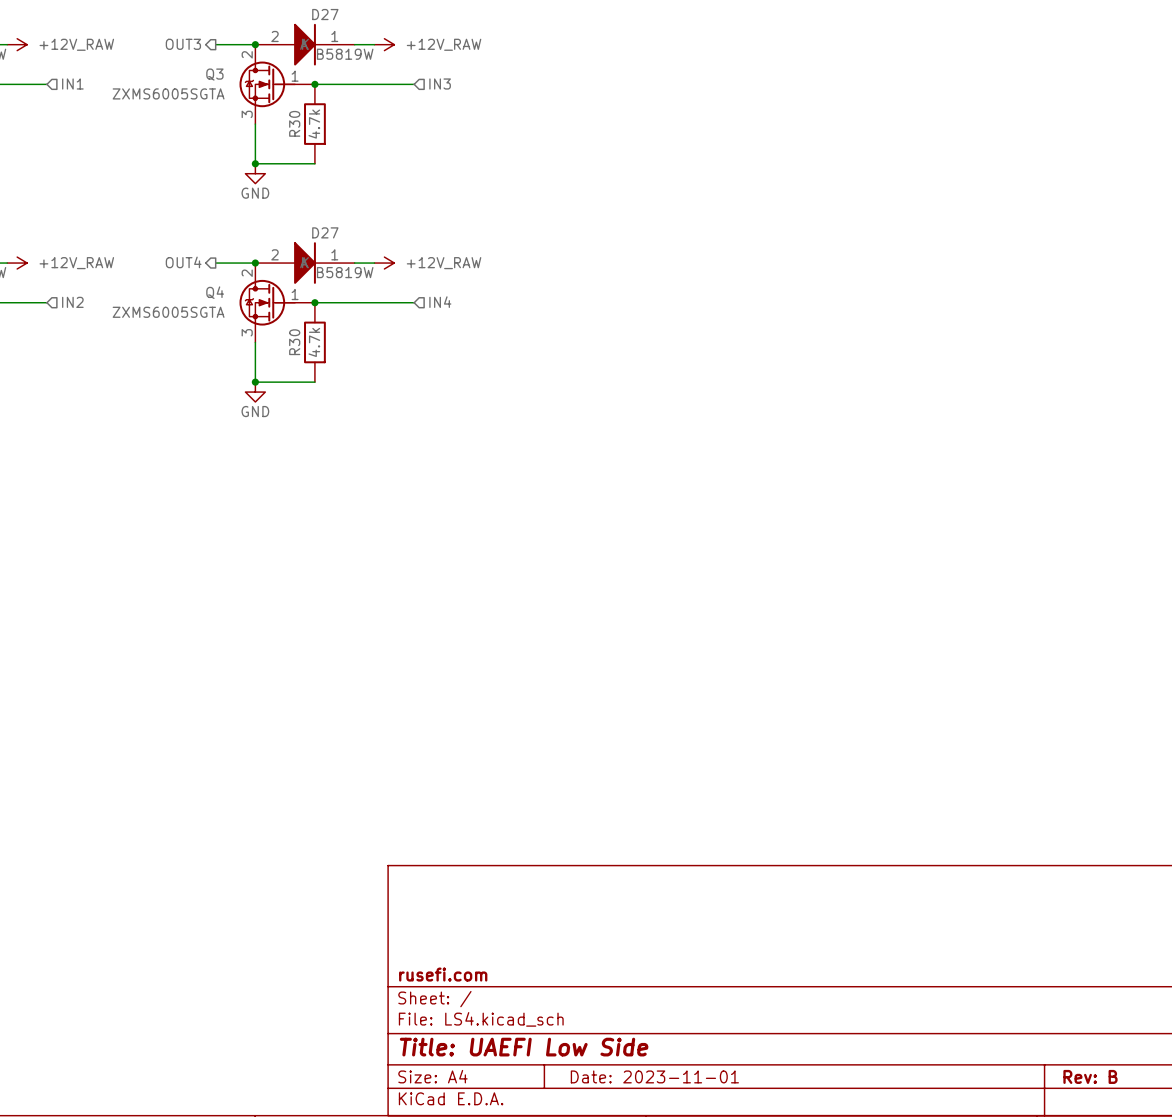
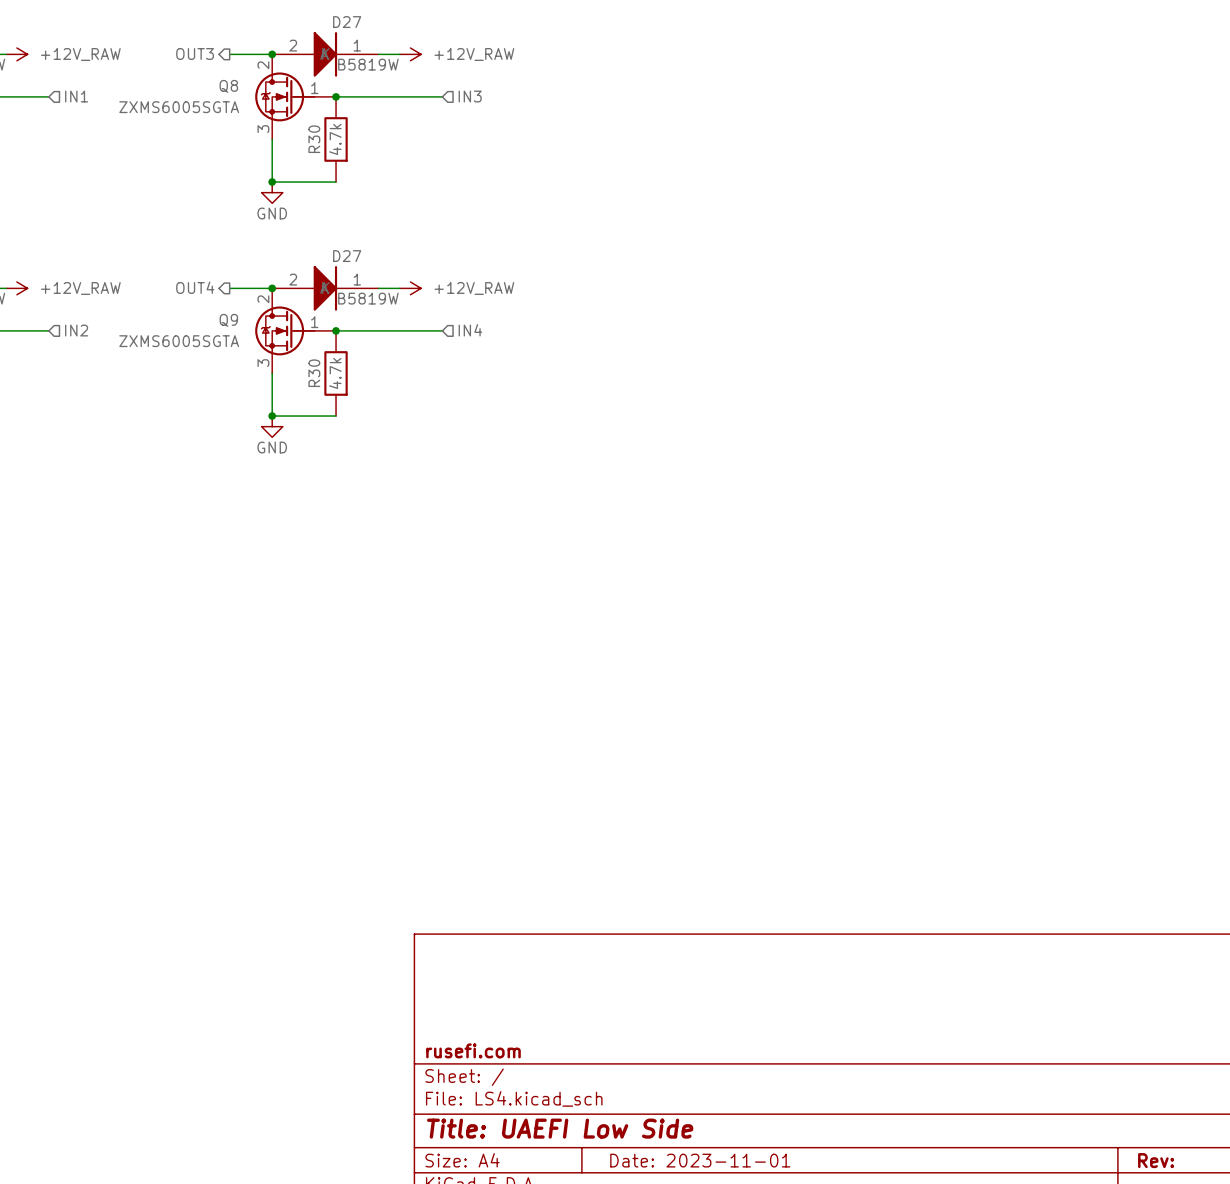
Q3 name: Q3 (214, 74) -> Q8 (228, 86)
Q4 name: Q4 (215, 292) -> Q9 (228, 320)
title block: Rev: B (1090, 1076) -> Rev: (1156, 1160)

